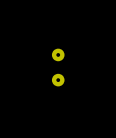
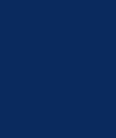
part: (58, 54) -> none
part: (58, 80) -> none

